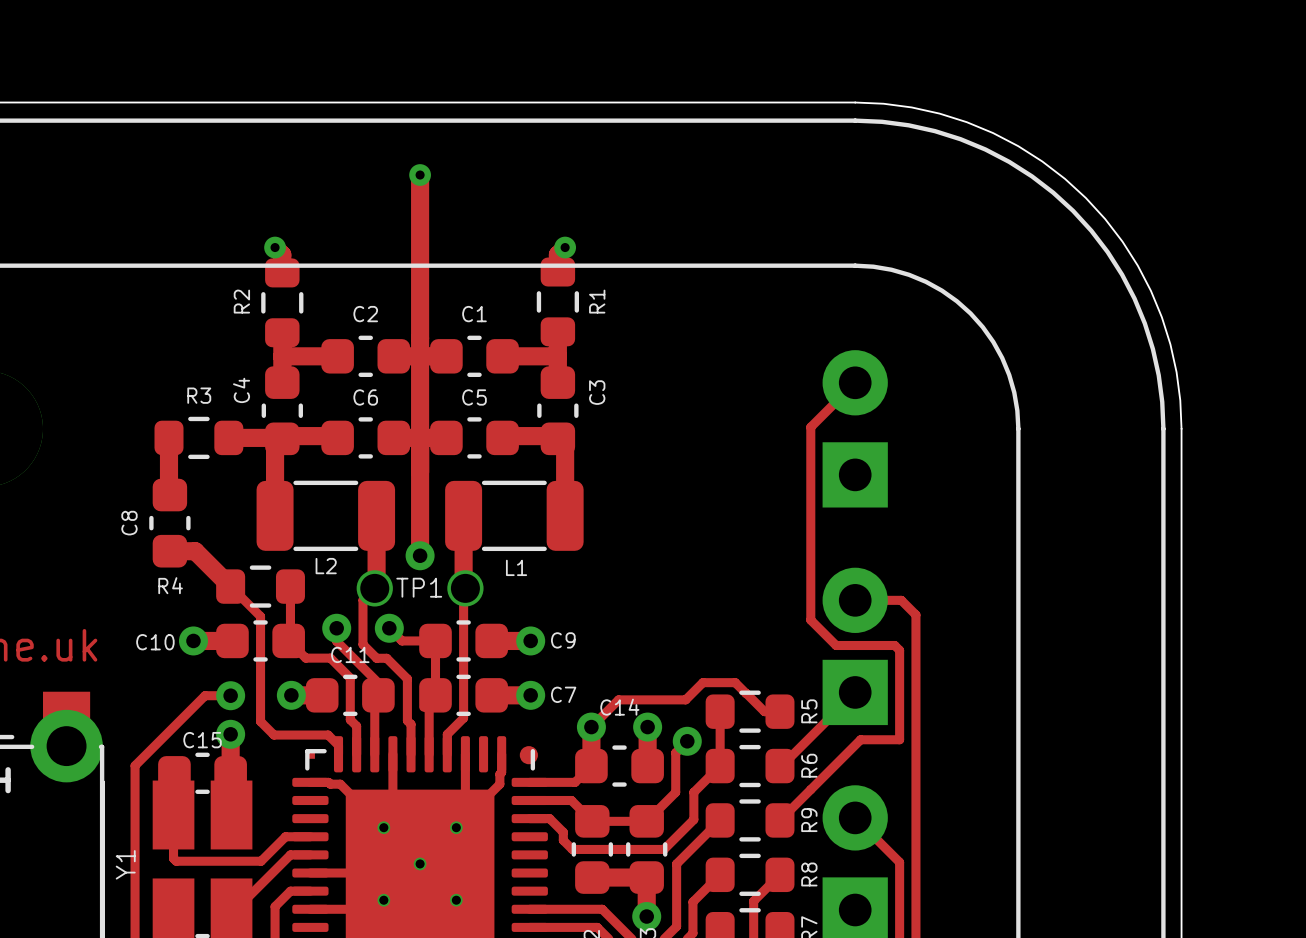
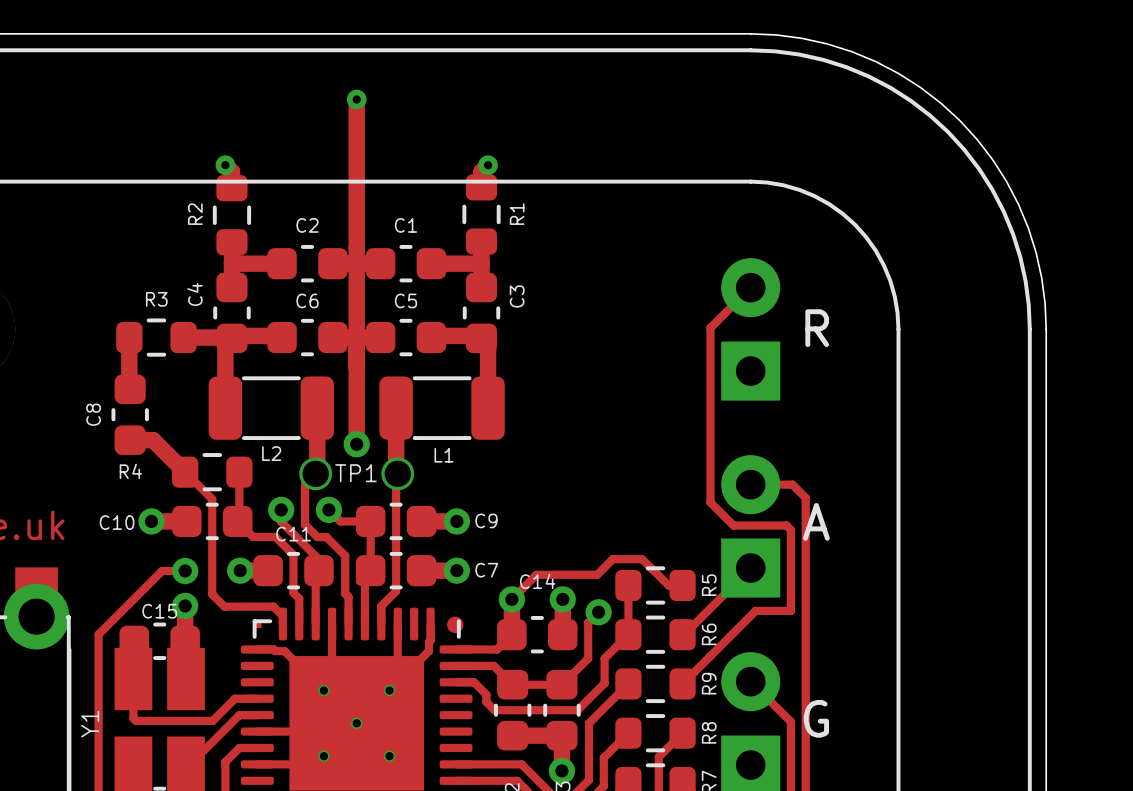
text: none -> R (817, 328)
text: none -> A (816, 521)
text: none -> G (816, 718)

